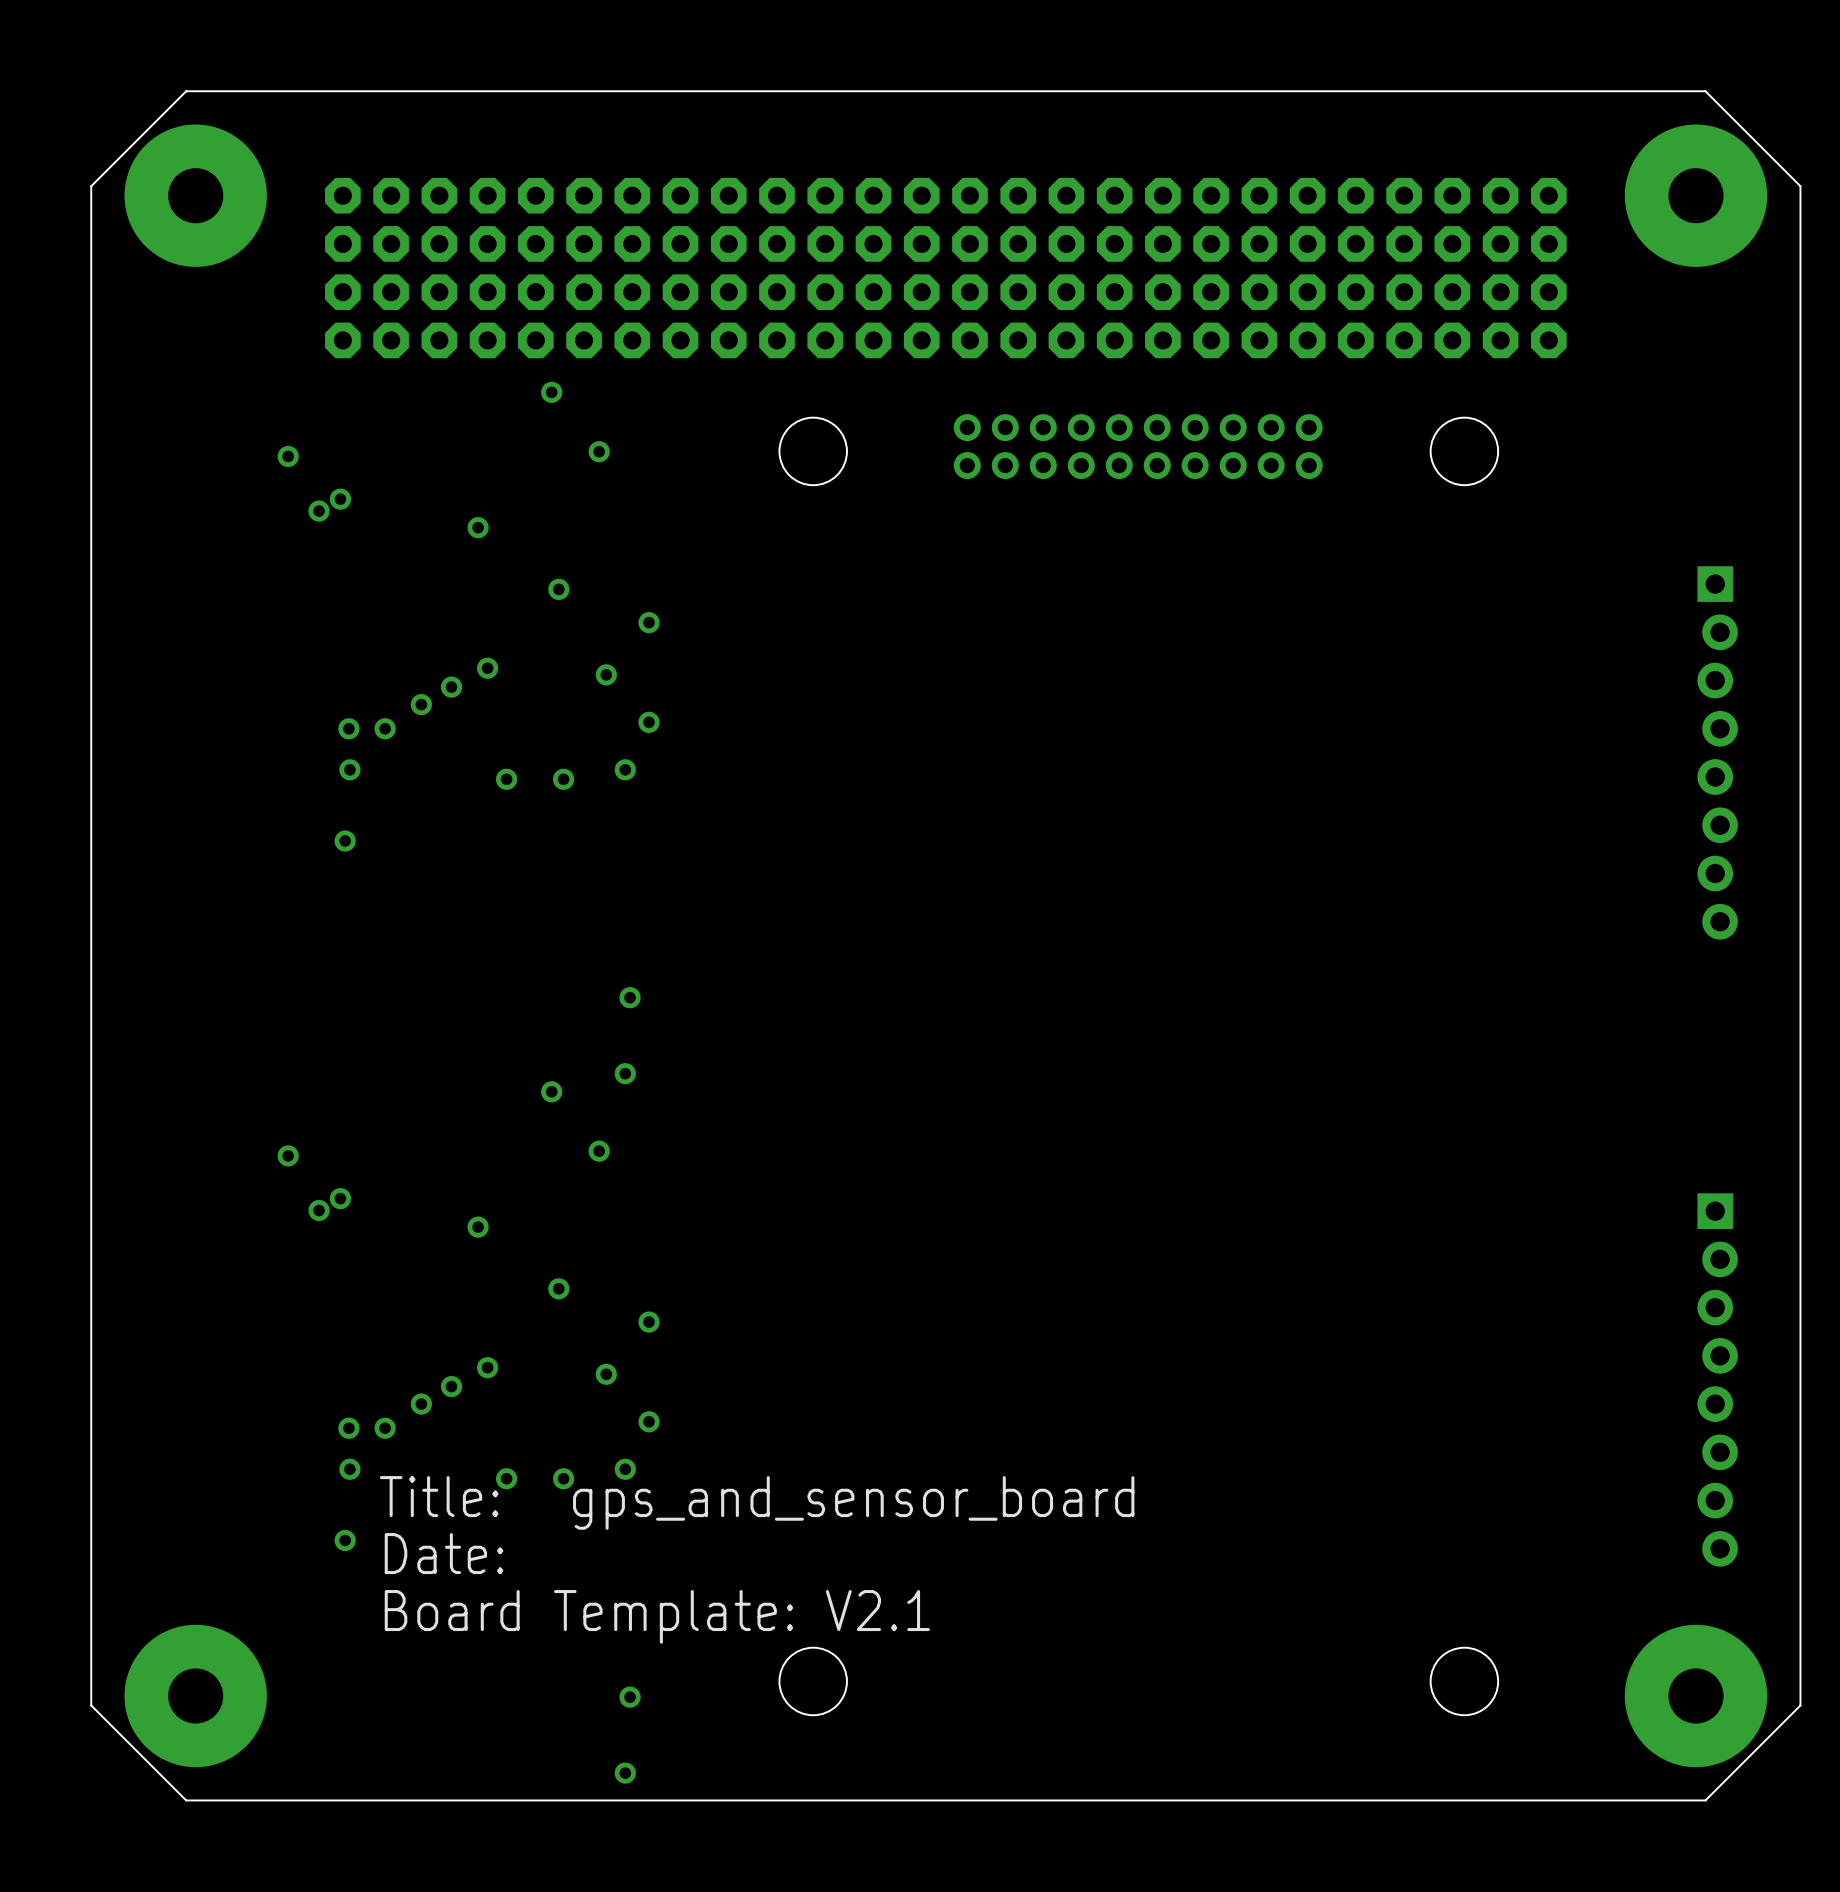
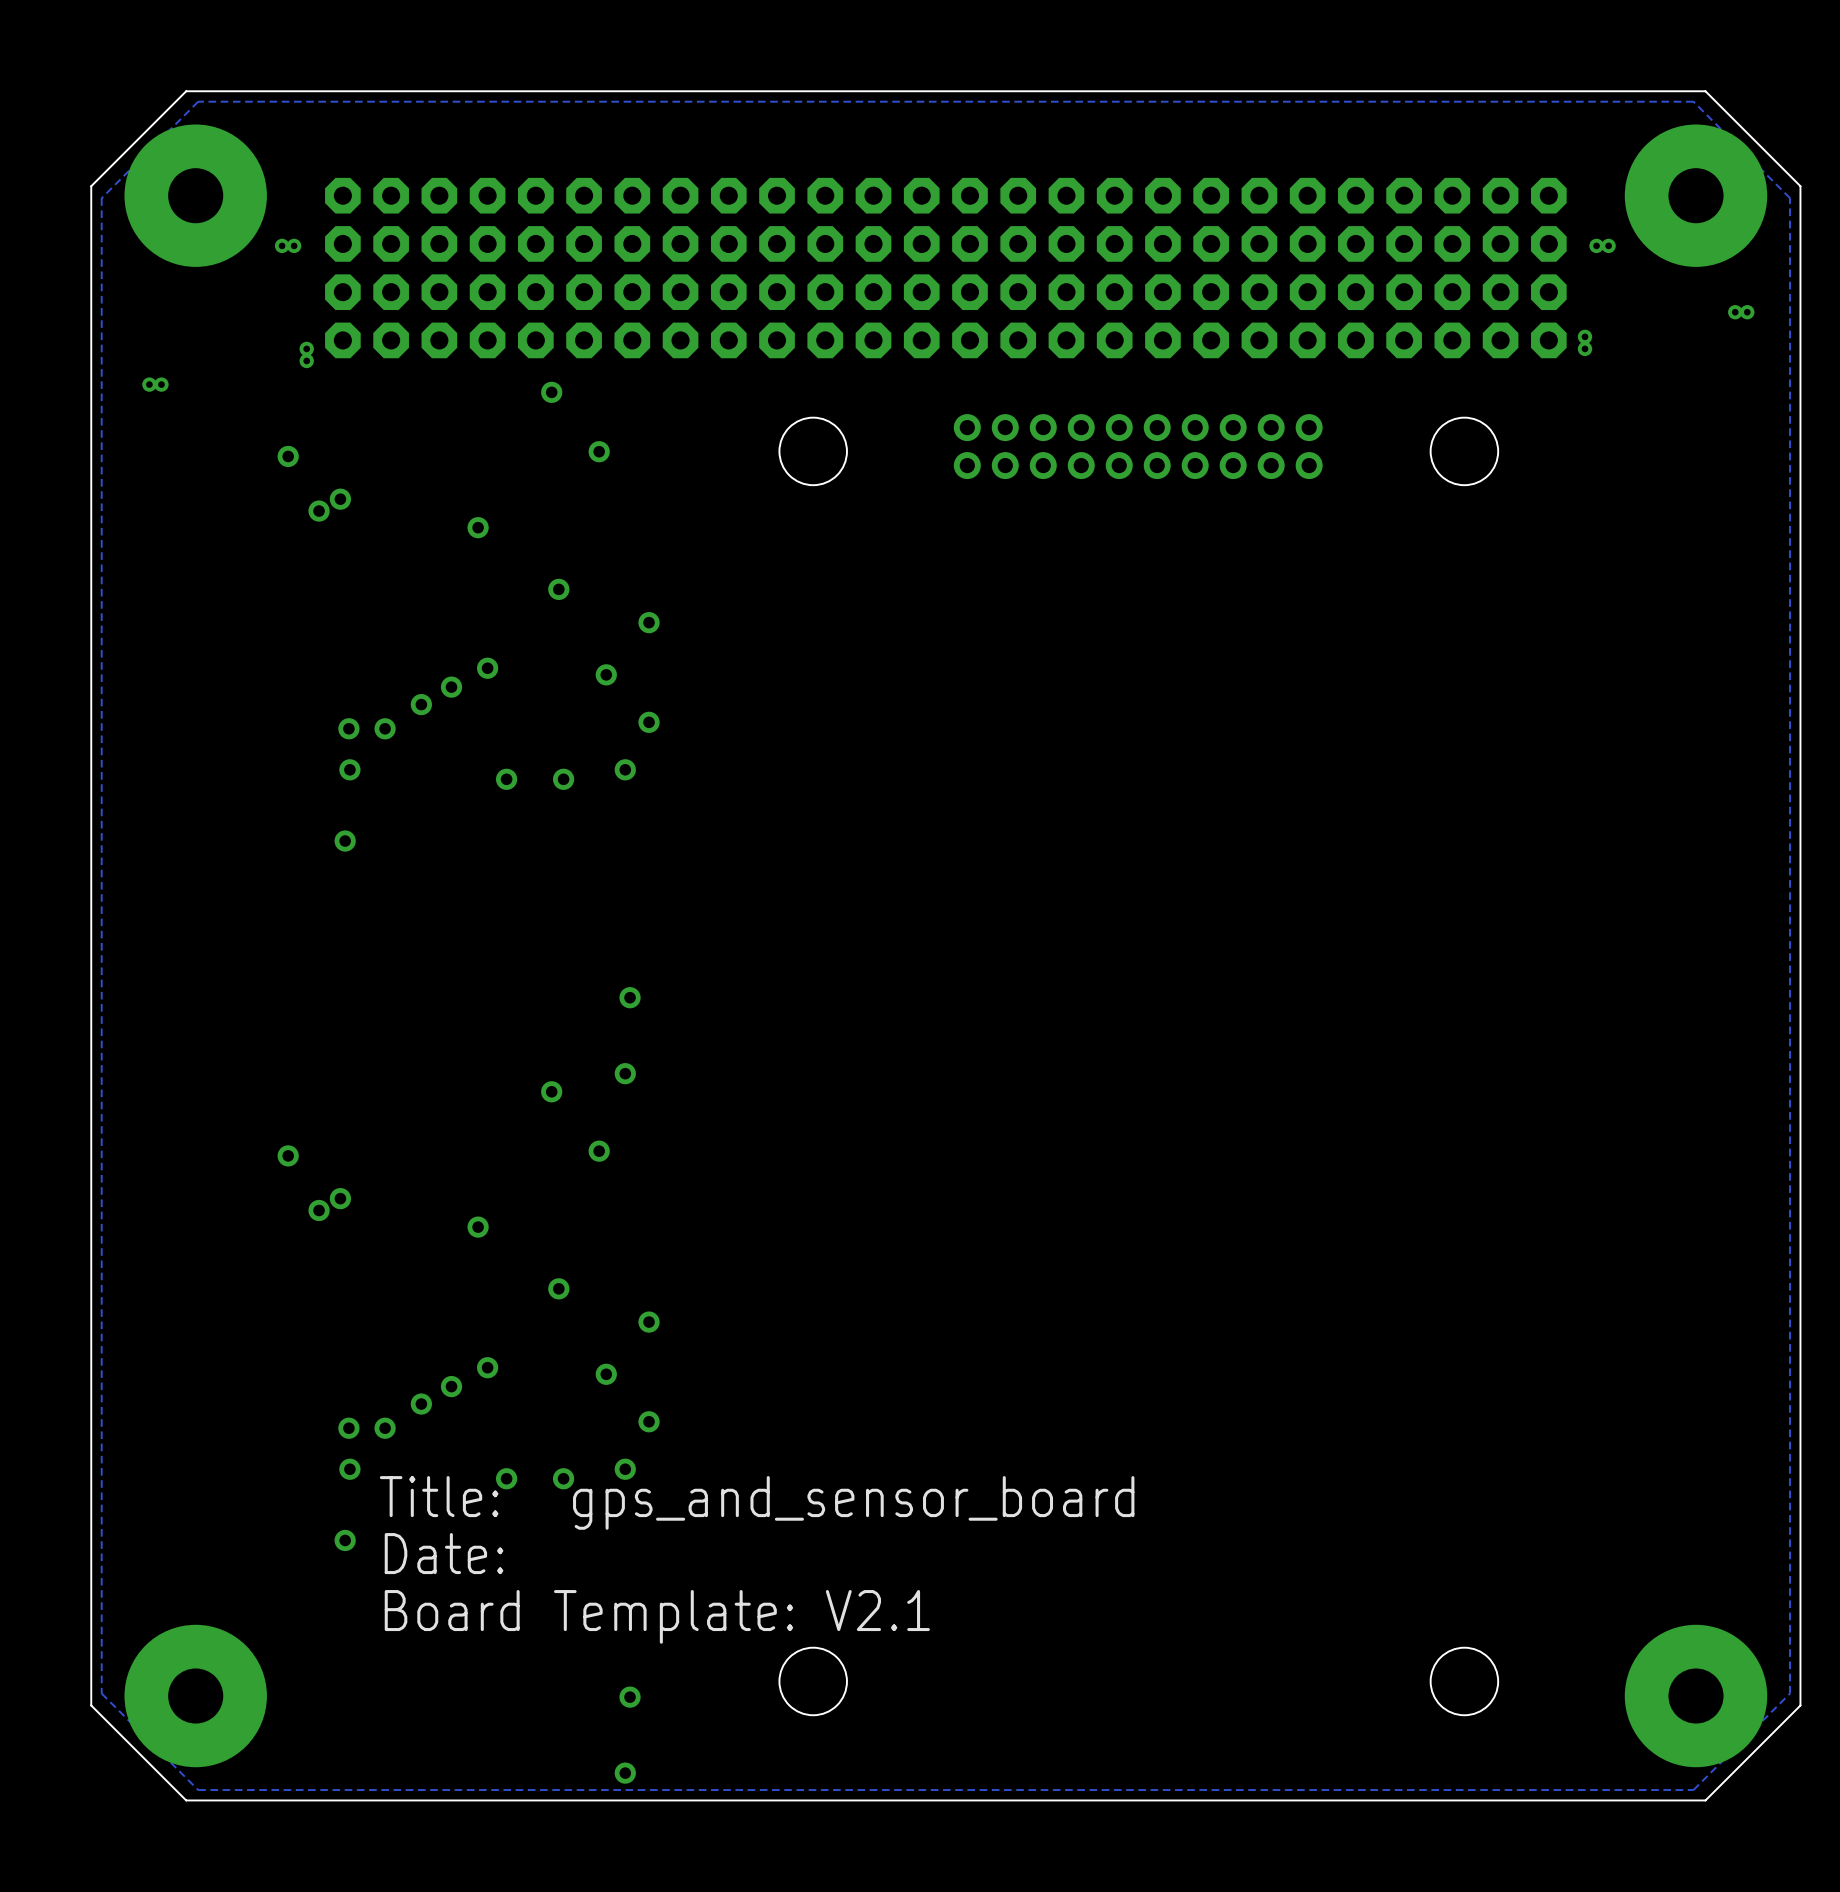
zone outline: none -> (1693, 101) (1790, 198) (1790, 1693) (1693, 1790) (198, 1790) (101, 1693) (101, 198) (198, 101) (1693, 101)
via: none -> (282, 245)
via: none -> (294, 245)
via: none -> (1596, 245)
via: none -> (1608, 245)
via: none -> (1735, 312)
via: none -> (1747, 312)
via: none -> (1585, 336)
via: none -> (306, 348)
via: none -> (1585, 348)
via: none -> (306, 360)
via: none -> (149, 384)
via: none -> (161, 384)
part: (1717, 752) -> none
part: (1717, 1379) -> none

